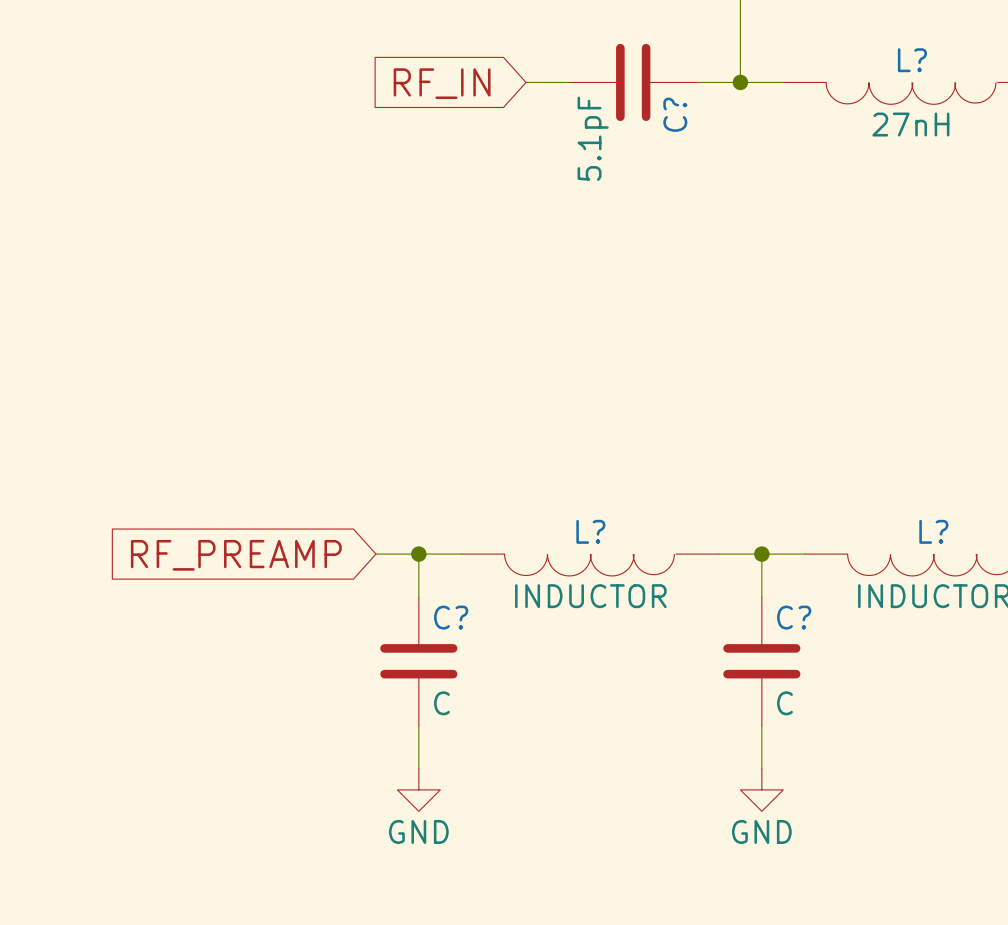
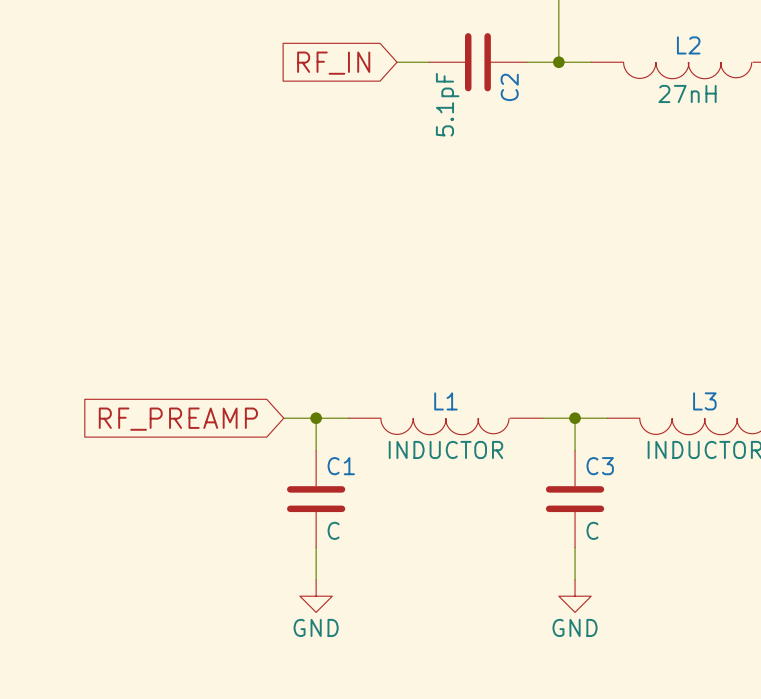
L? name: L? (912, 60) -> L2 (688, 45)
C? name: C? (675, 114) -> C2 (509, 87)
L? name: L? (590, 531) -> L1 (445, 401)
L? name: L? (933, 531) -> L3 (704, 401)
C? name: C? (451, 617) -> C1 (341, 466)
C? name: C? (794, 617) -> C3 (600, 466)

